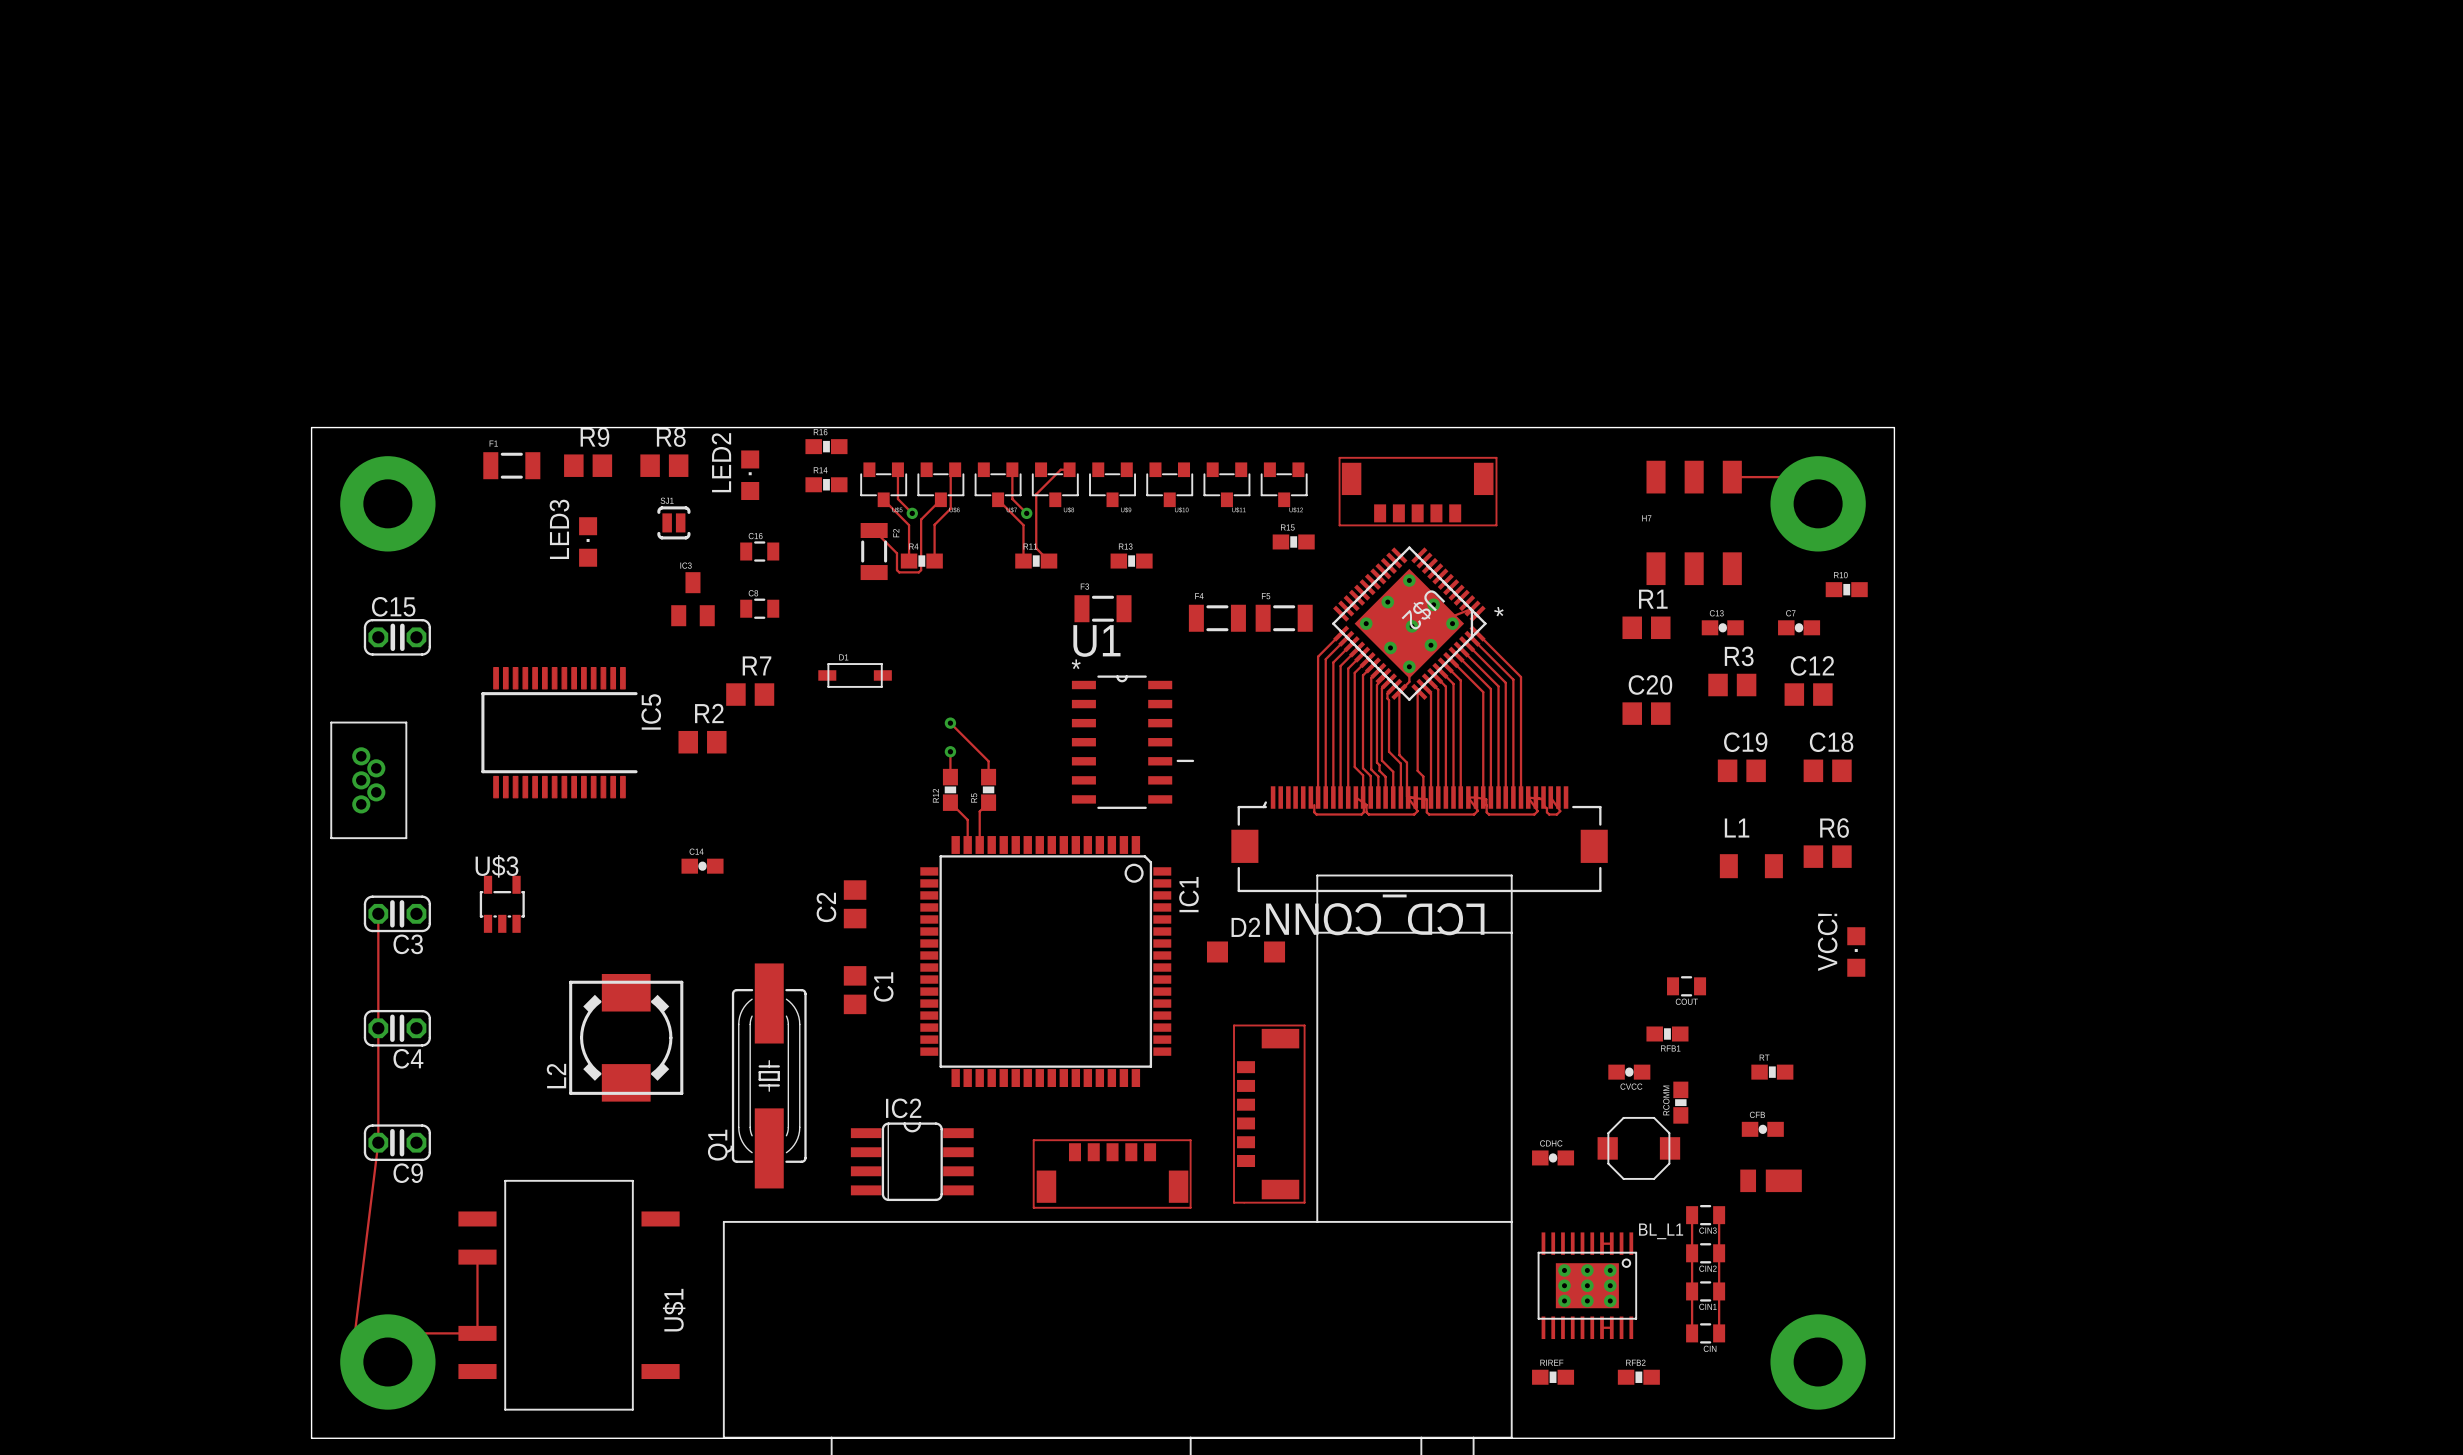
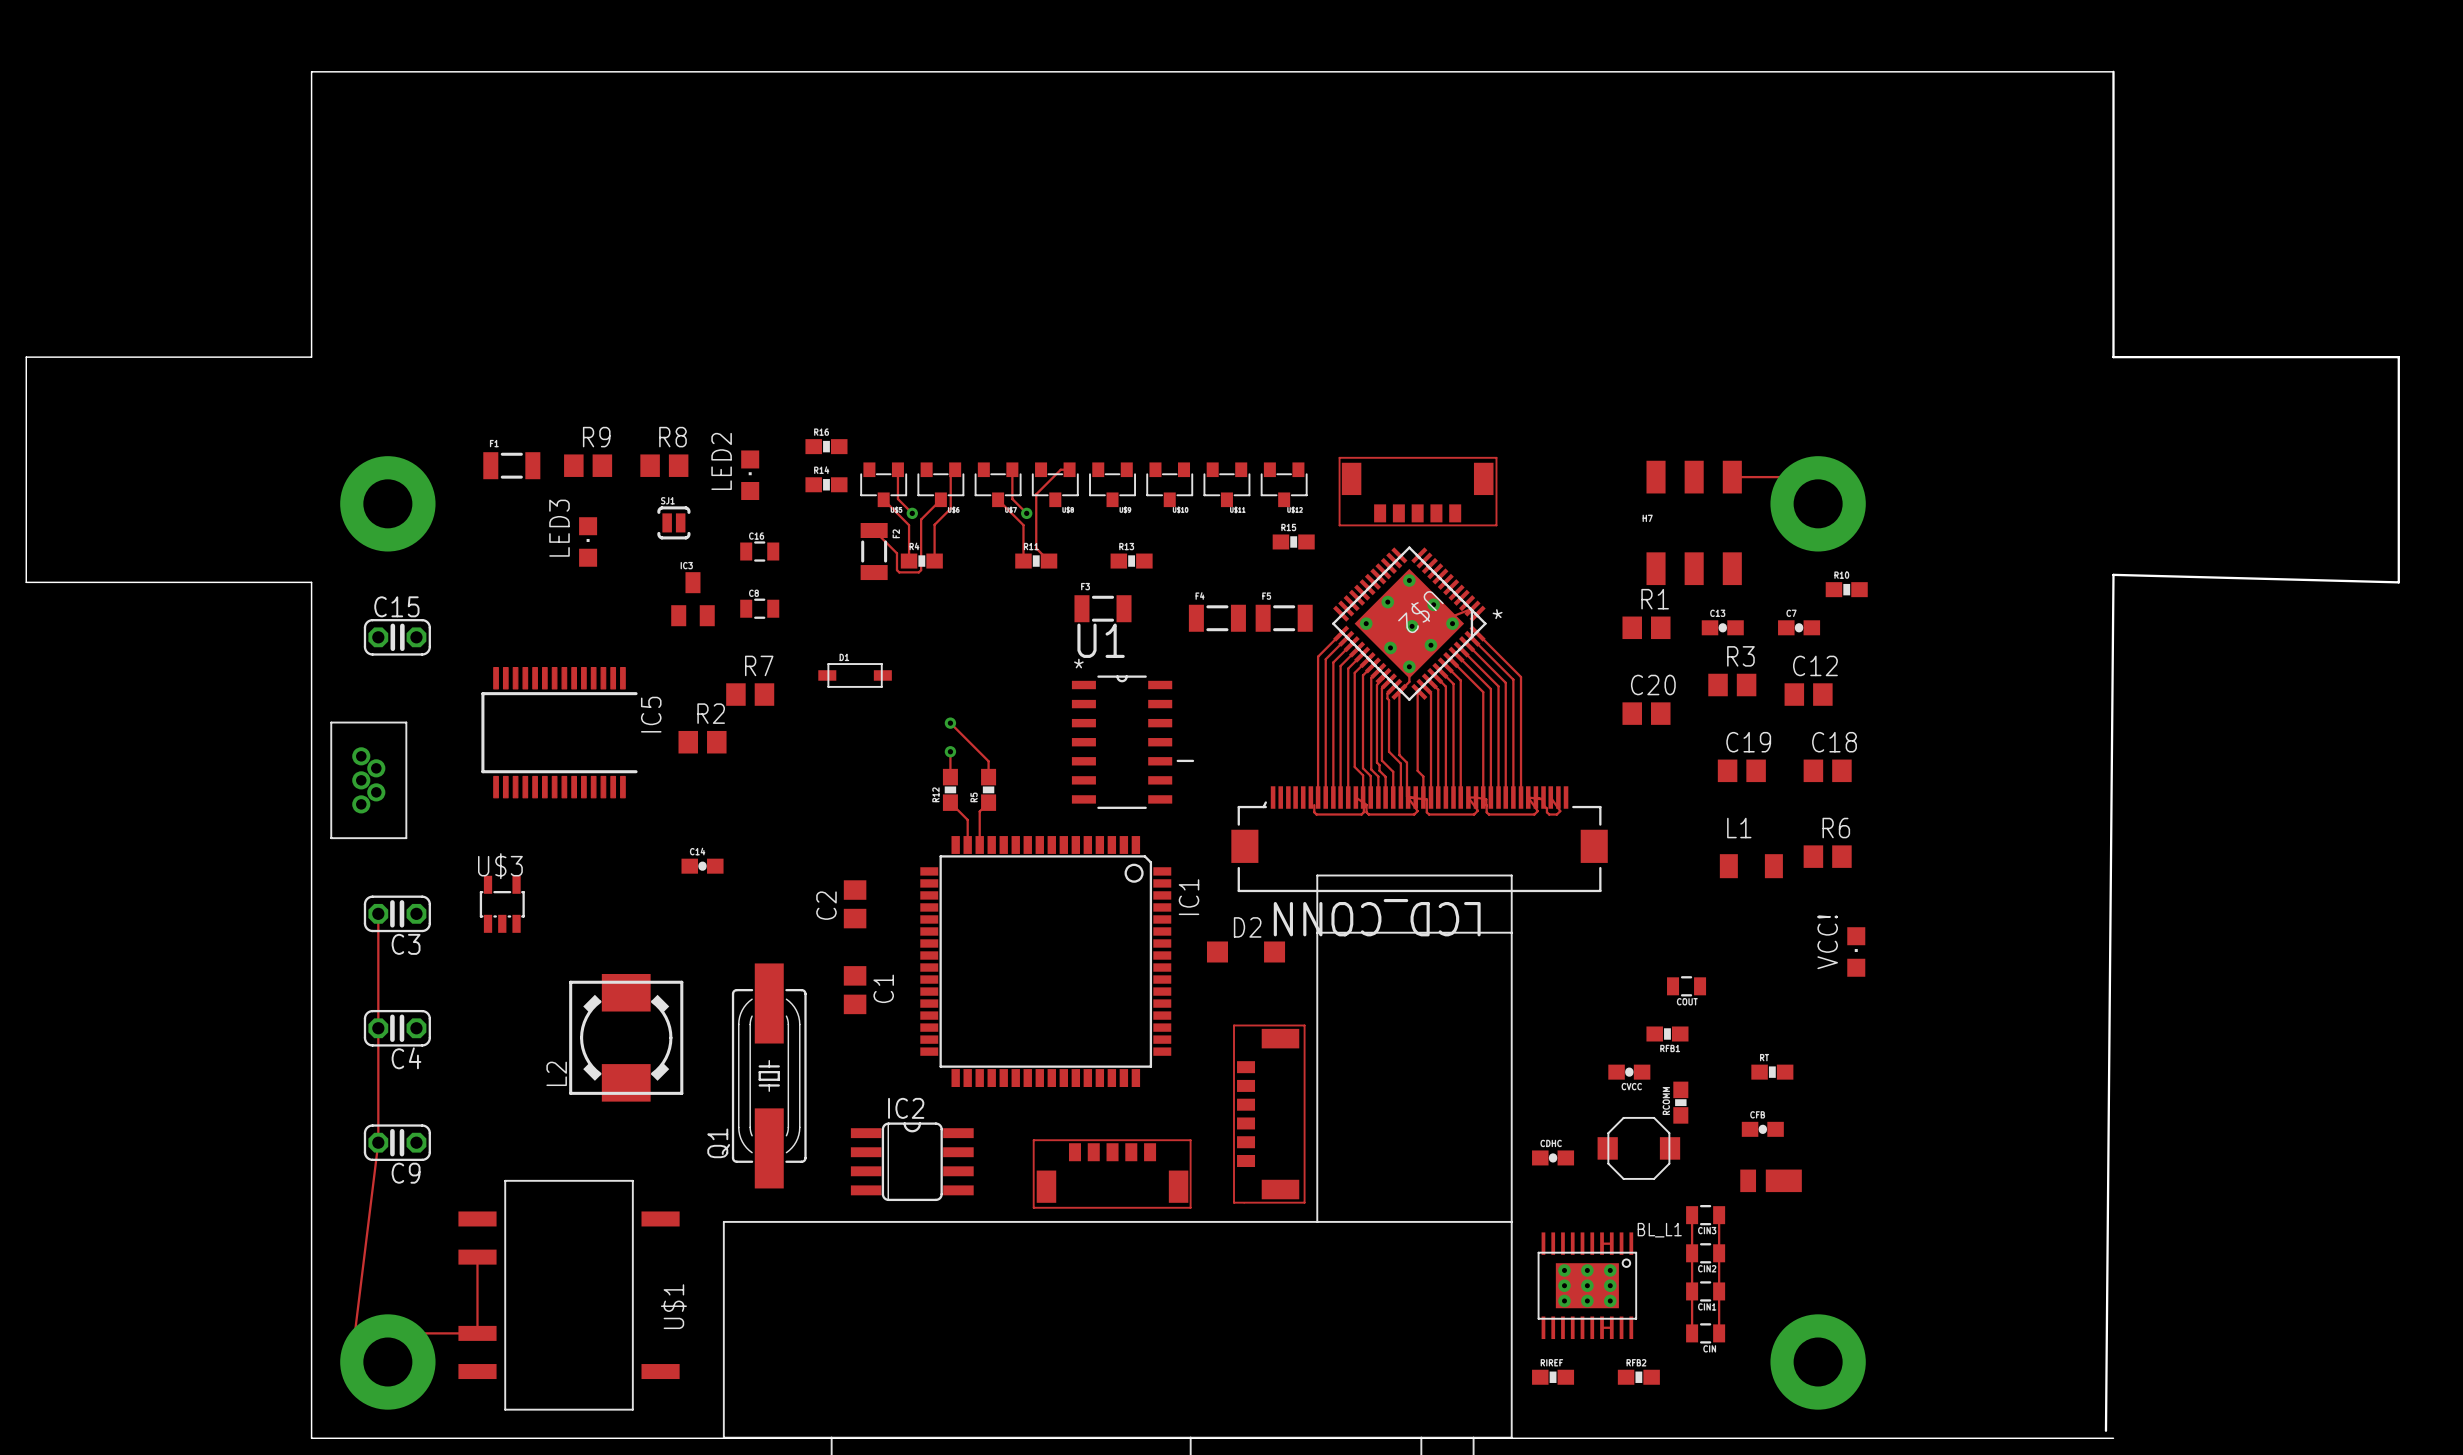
board edge: (311, 582) (311, 427) (1894, 427) (1894, 1438) -> (311, 582) (26, 582) (26, 357) (311, 357) (311, 71) (2113, 71) (2113, 357) (2398, 357) (2398, 582) (2113, 574) (2105, 1430)
board edge: none -> (1894, 1438) (2113, 1438)

